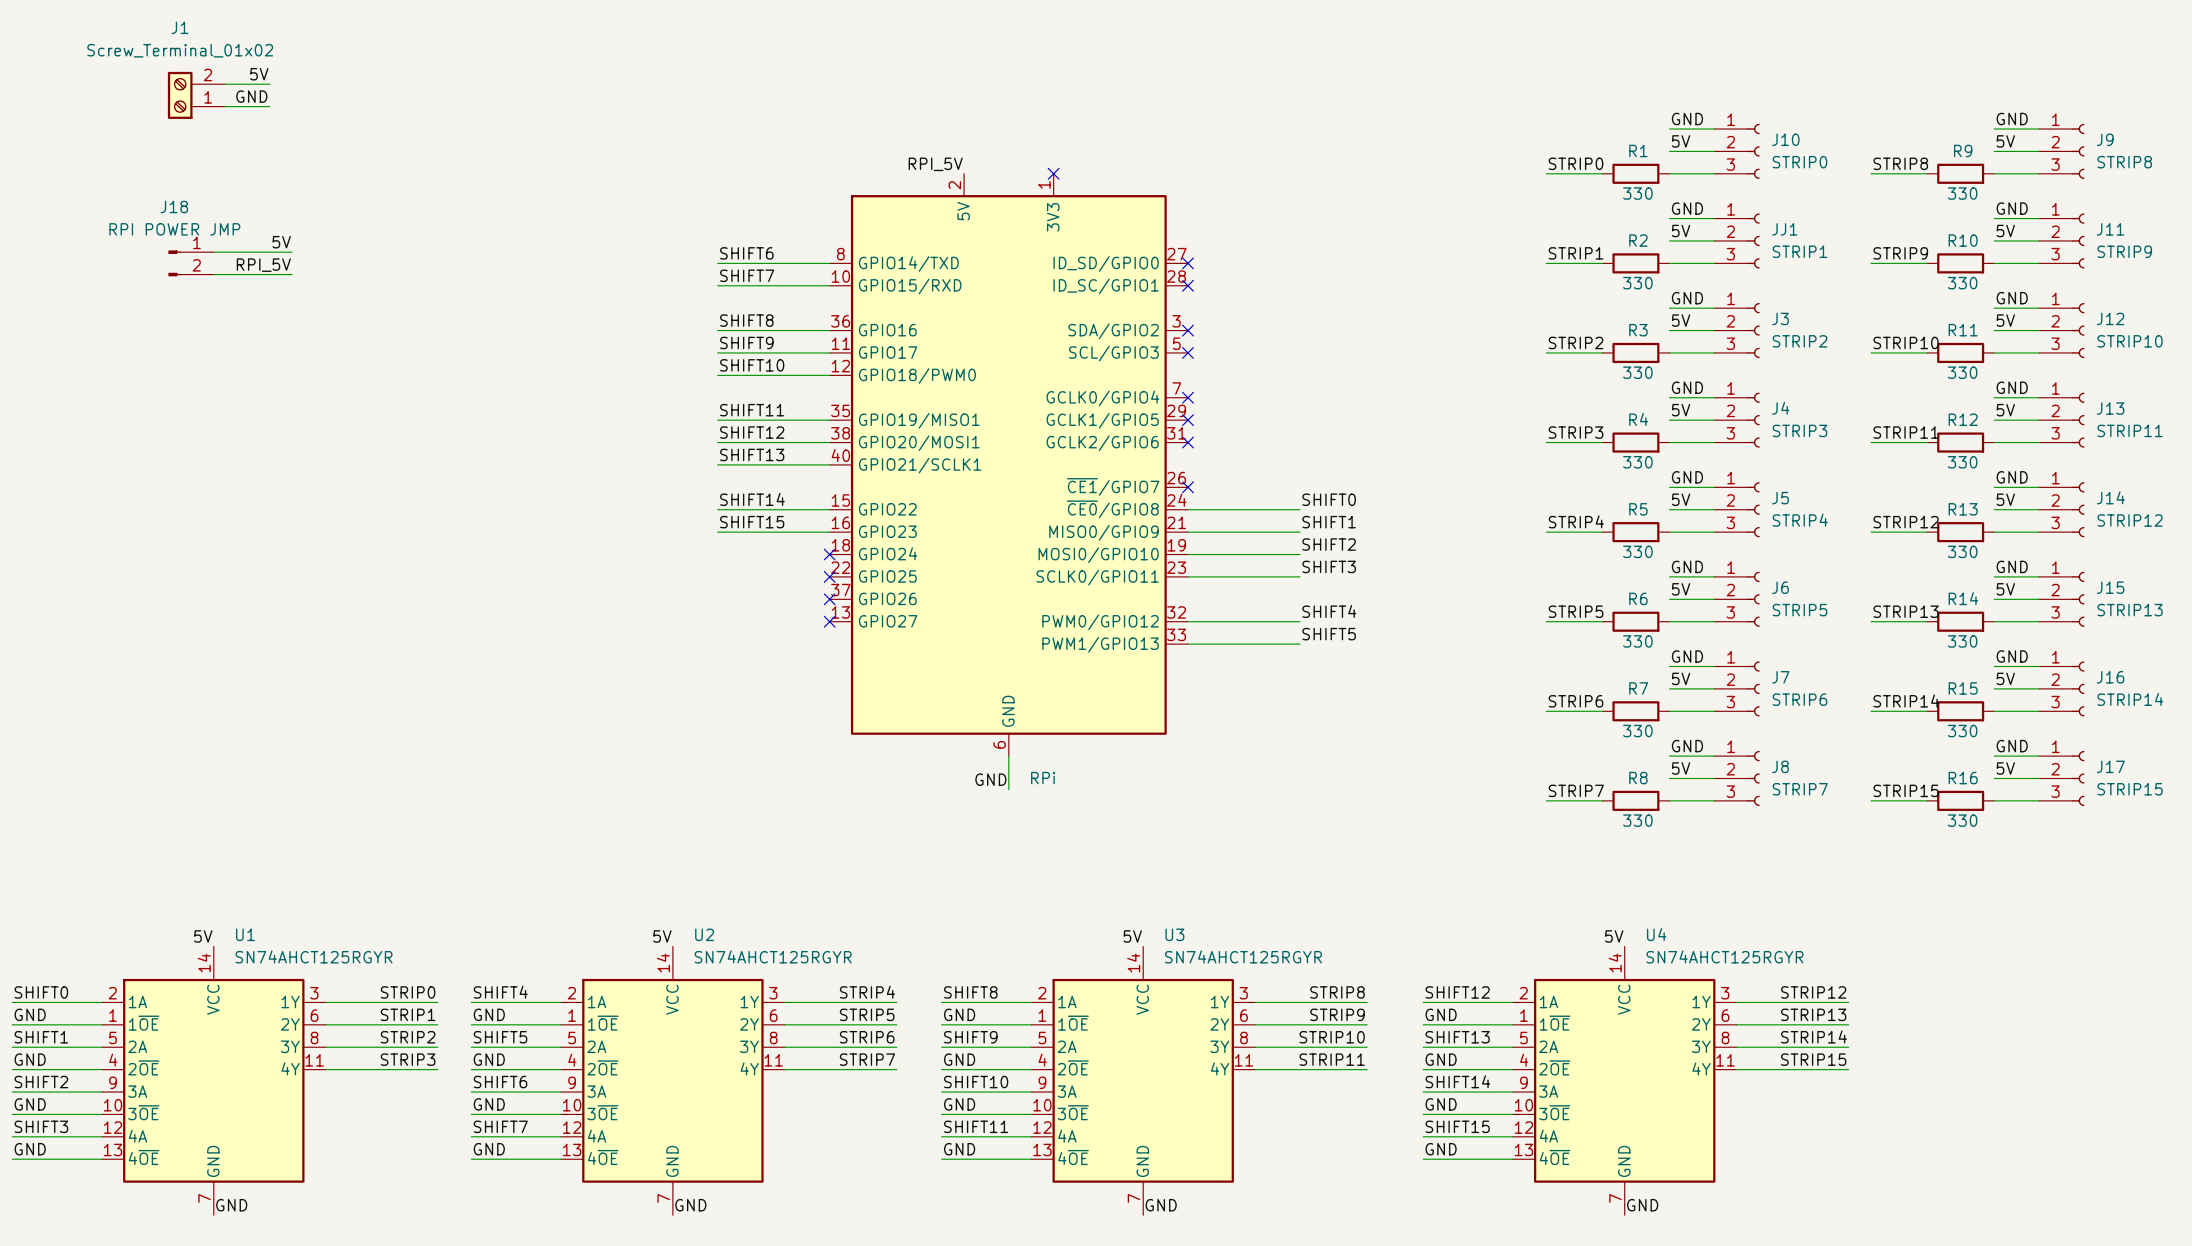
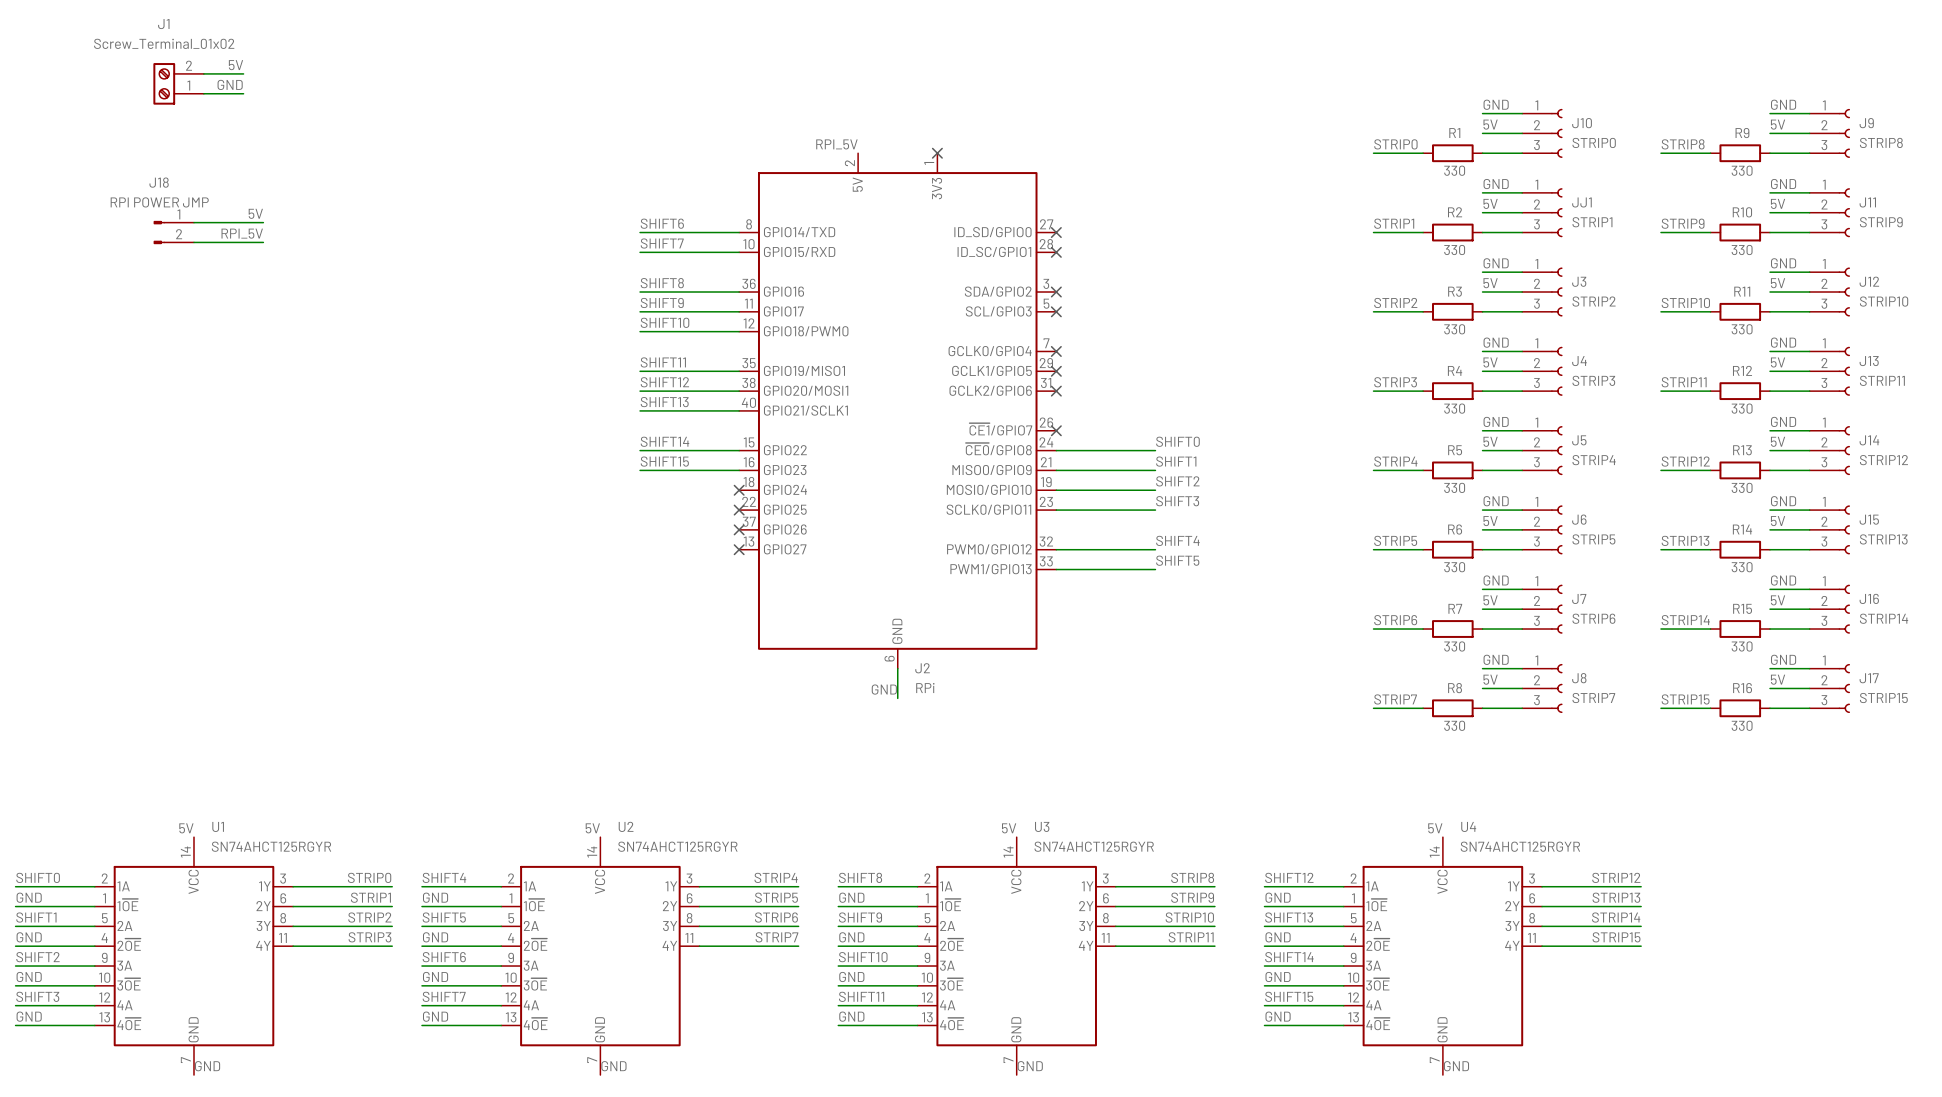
J2 name: none -> J2 (922, 668)

